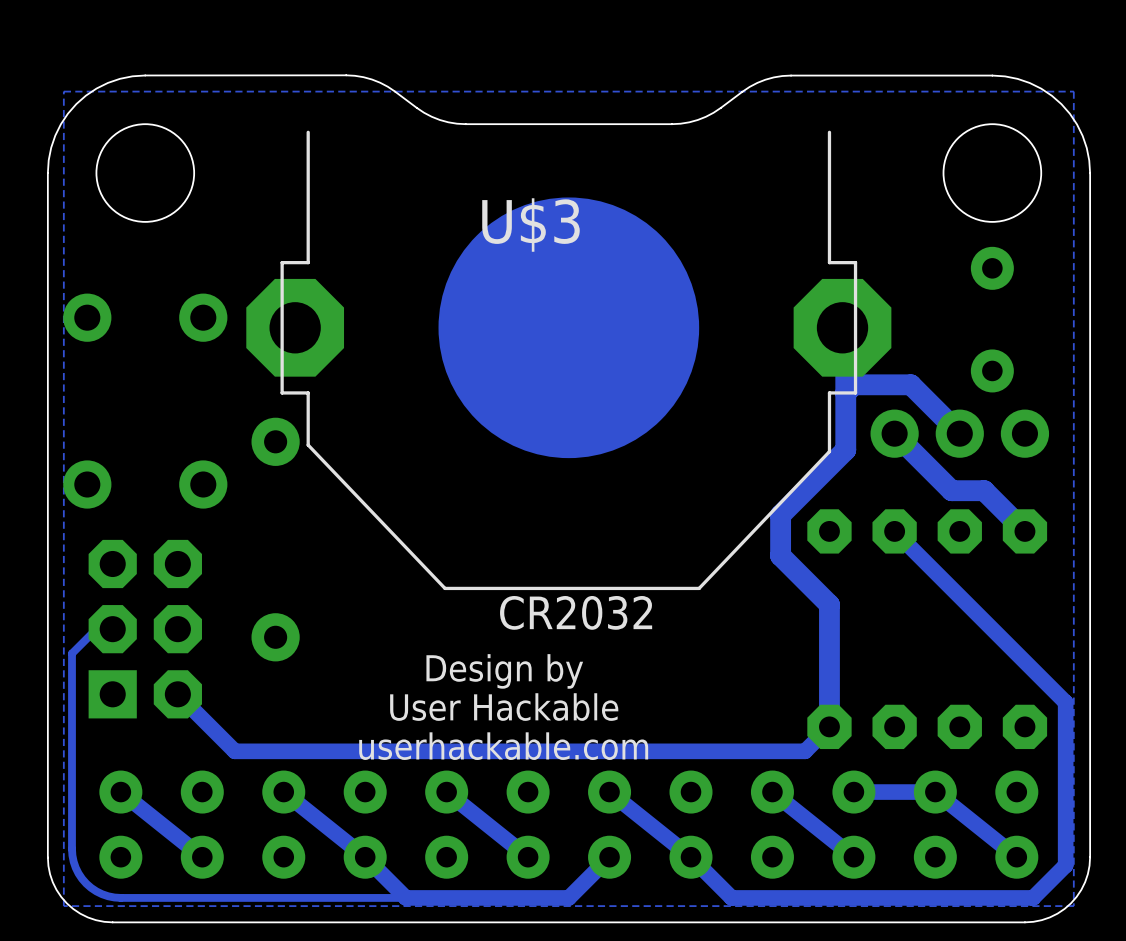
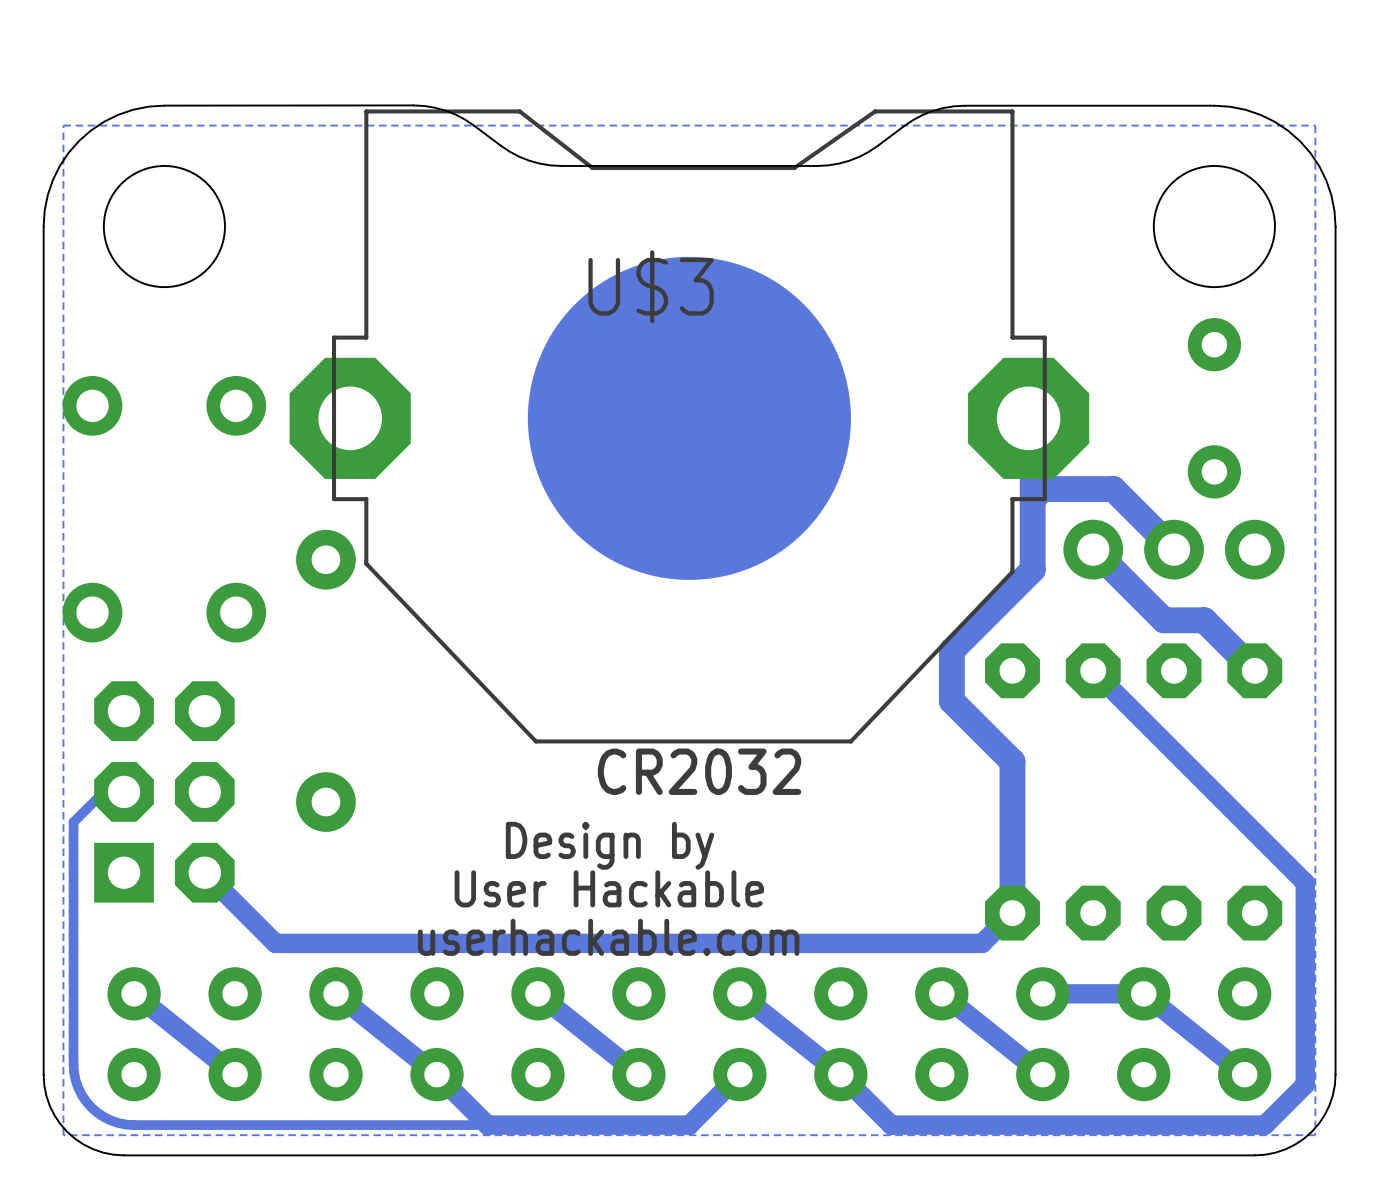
U$3 footprint: [246, 130, 892, 591] -> [289, 109, 1090, 744]

